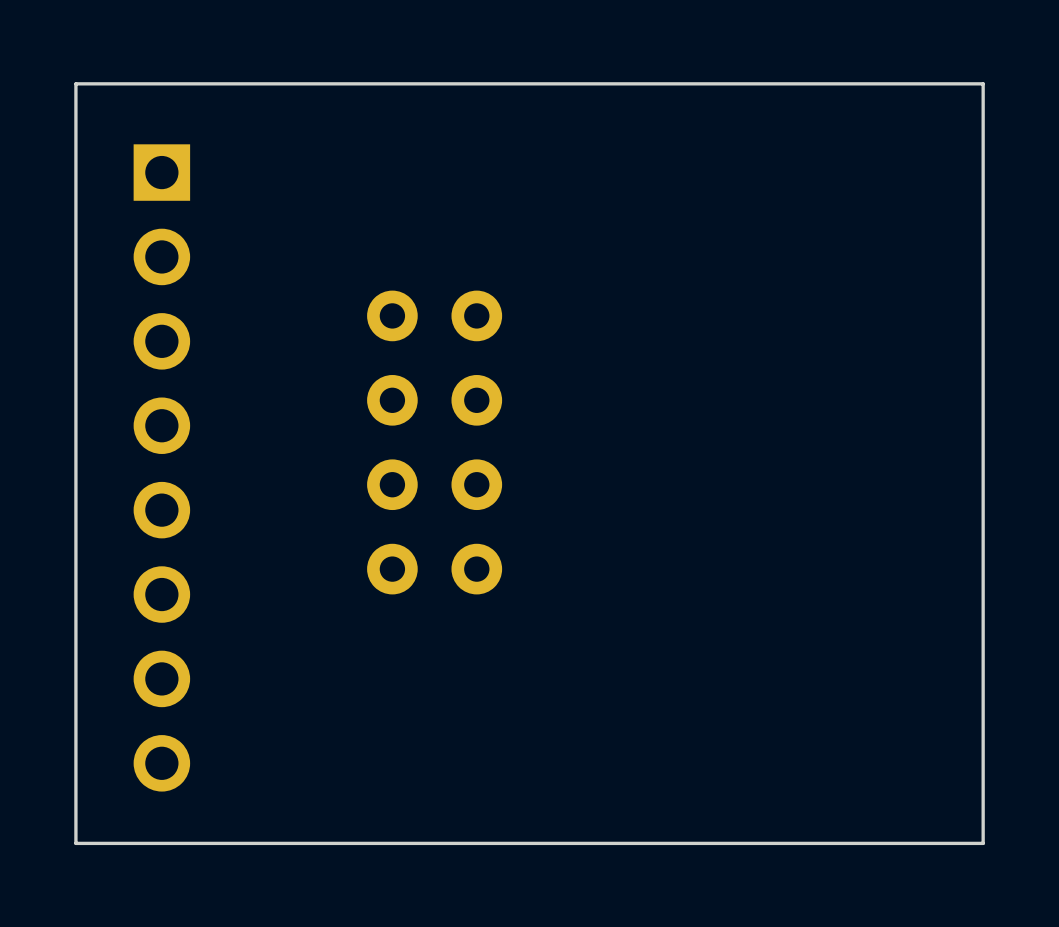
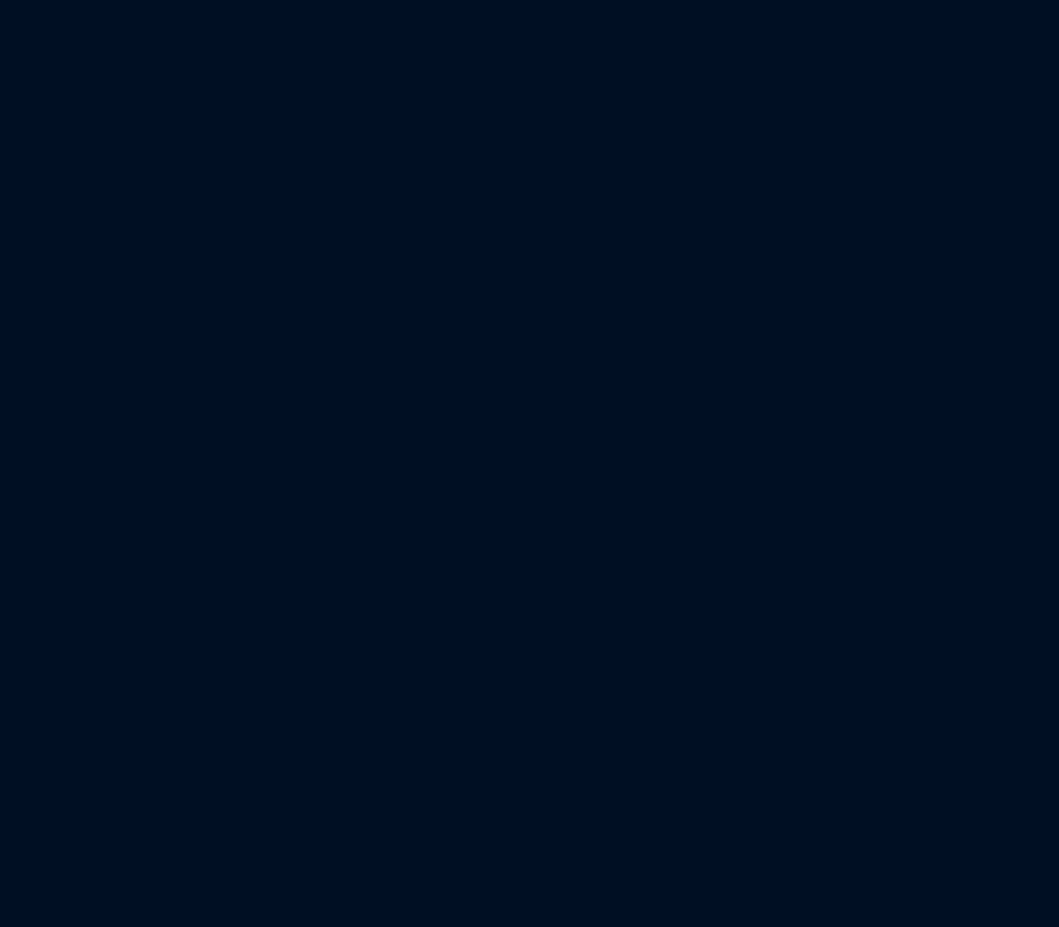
board edge: (983, 83) (983, 843) (75, 843) (75, 83) (983, 83) -> none
part: (434, 442) -> none
part: (161, 467) -> none

